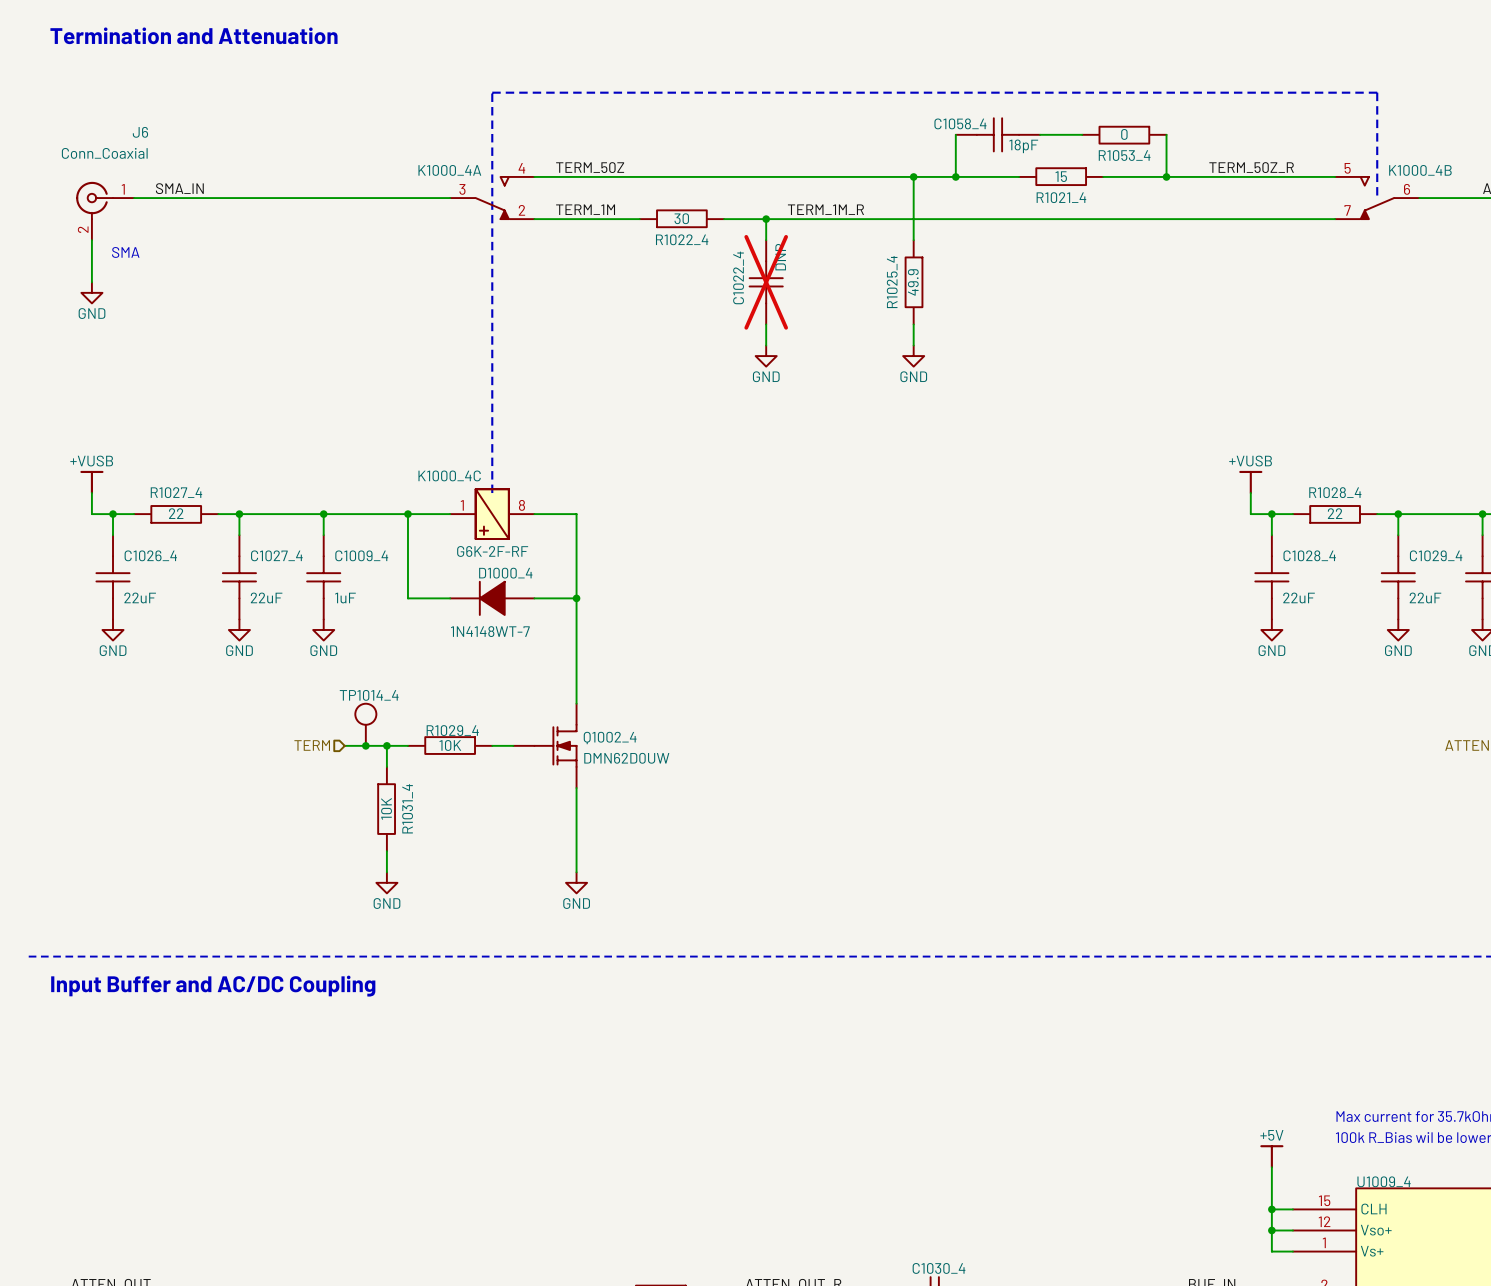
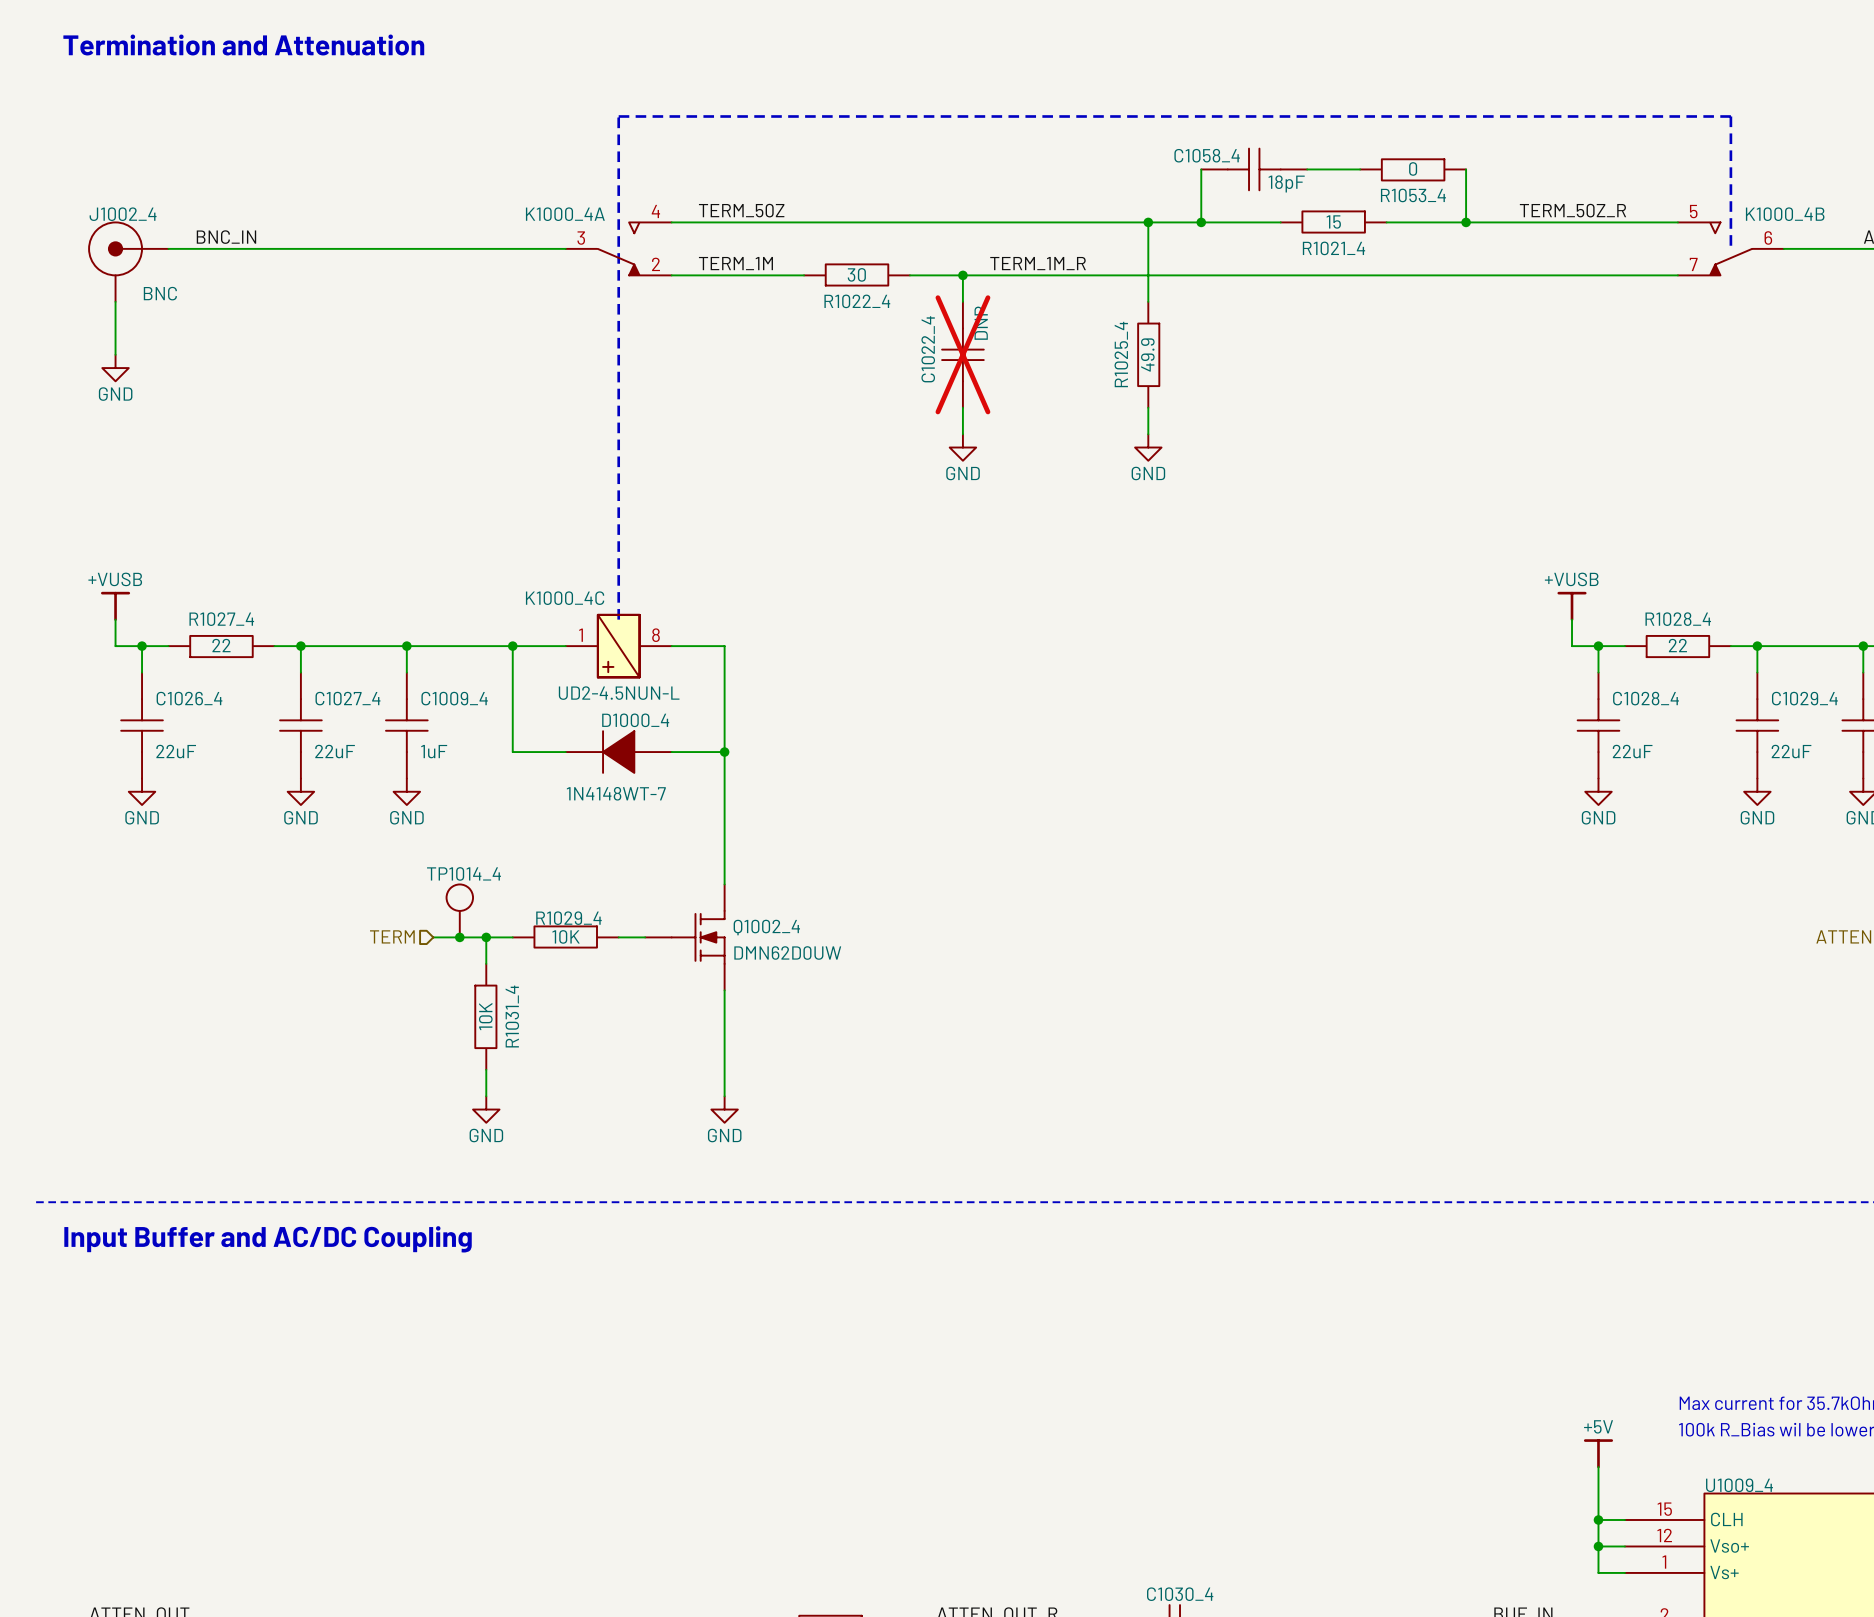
label: SMA_IN (179, 188) -> BNC_IN (226, 237)
J1002_4: none -> BNC (128, 262)
J6: Conn_Coaxial (105, 211) -> none
text: SMA (125, 252) -> none
K1000_4C value: G6K-2F-RF (492, 551) -> UD2-4.5NUN-L (619, 693)

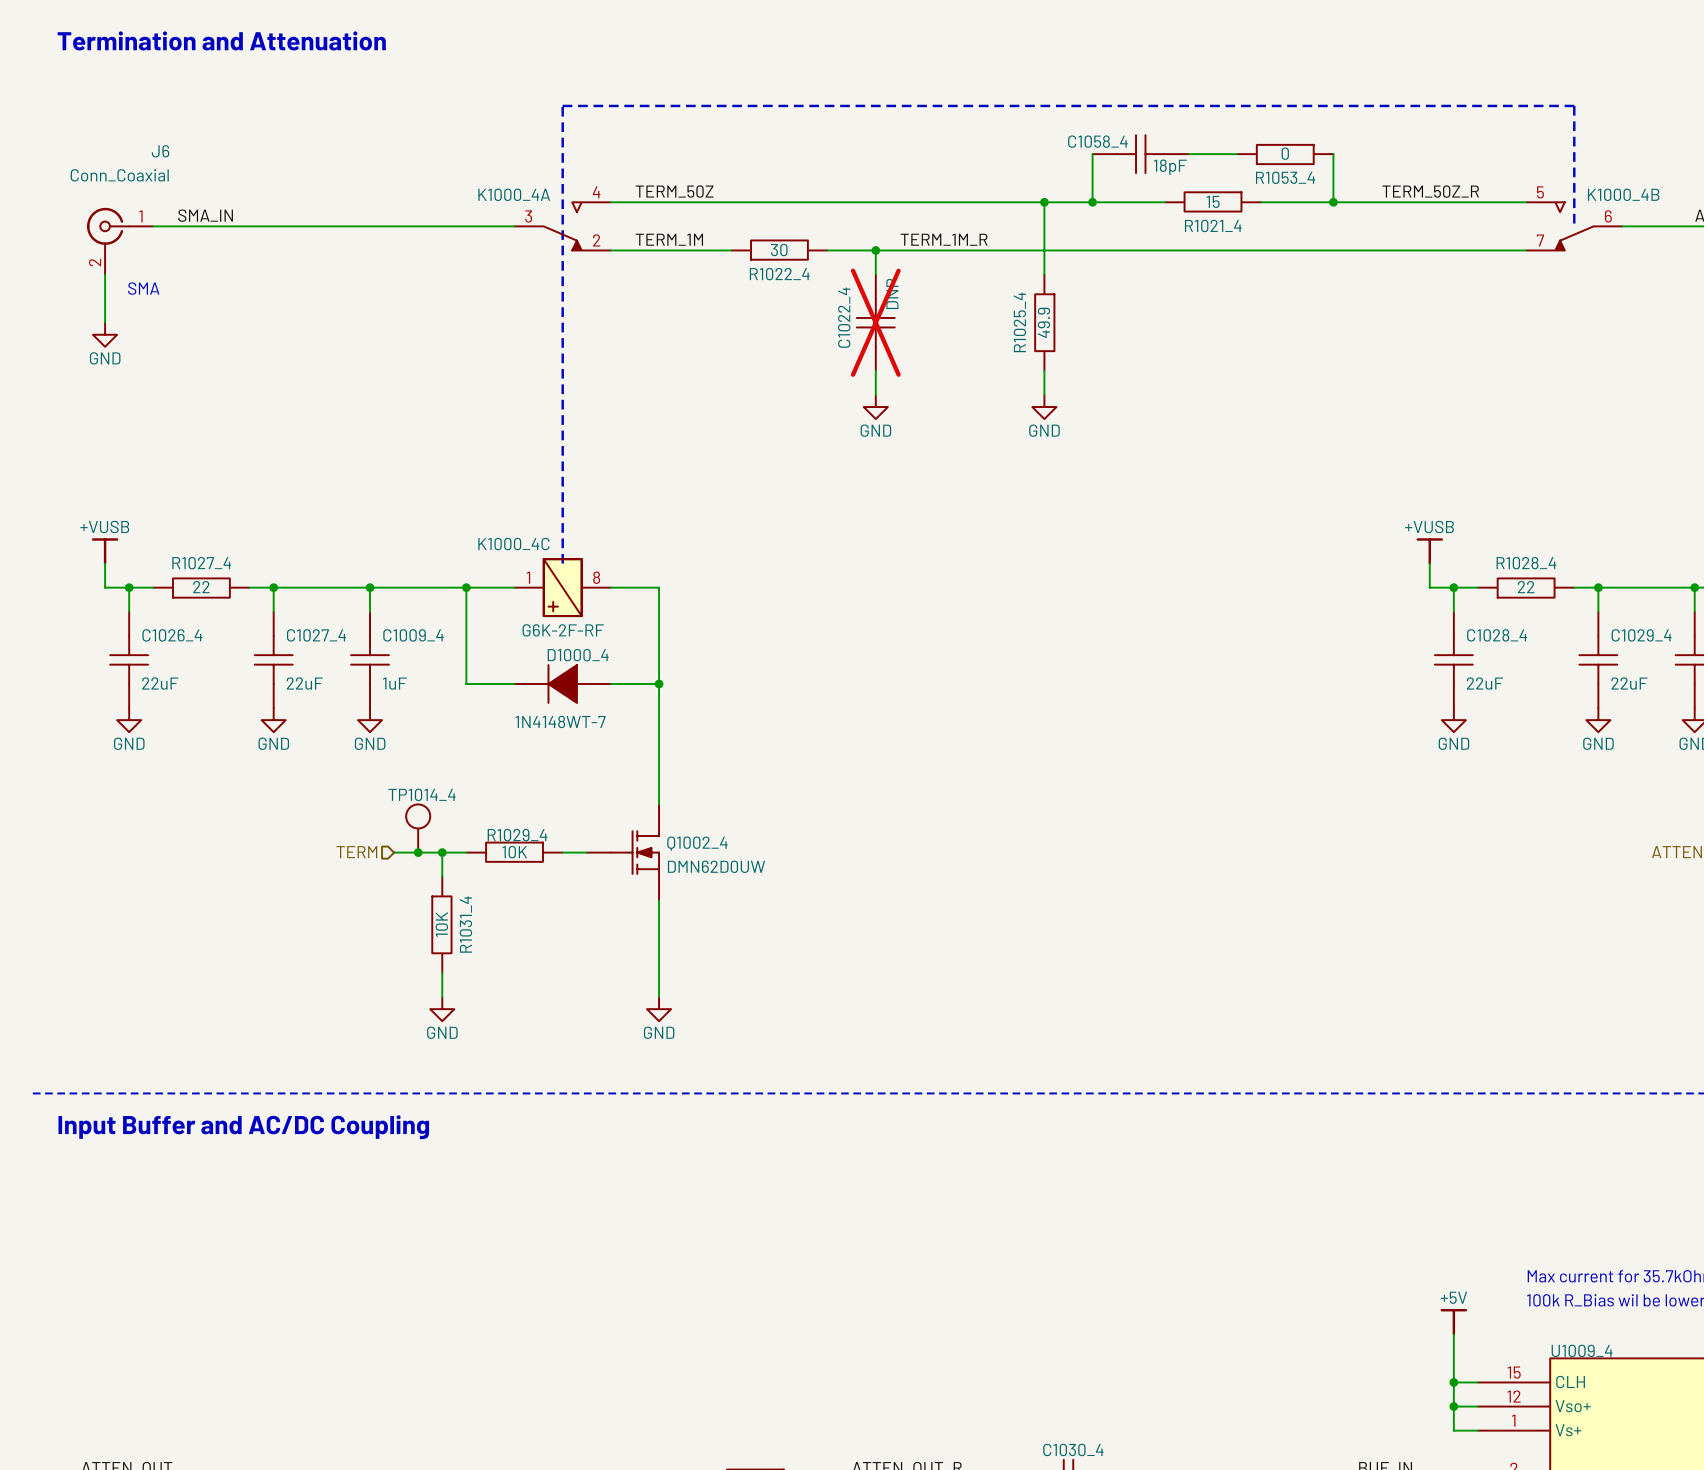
label: BNC_IN (226, 237) -> SMA_IN (205, 215)
J1002_4: BNC (128, 262) -> none
J6: none -> Conn_Coaxial (120, 241)
text: none -> SMA (143, 288)
K1000_4C value: UD2-4.5NUN-L (619, 693) -> G6K-2F-RF (563, 630)

